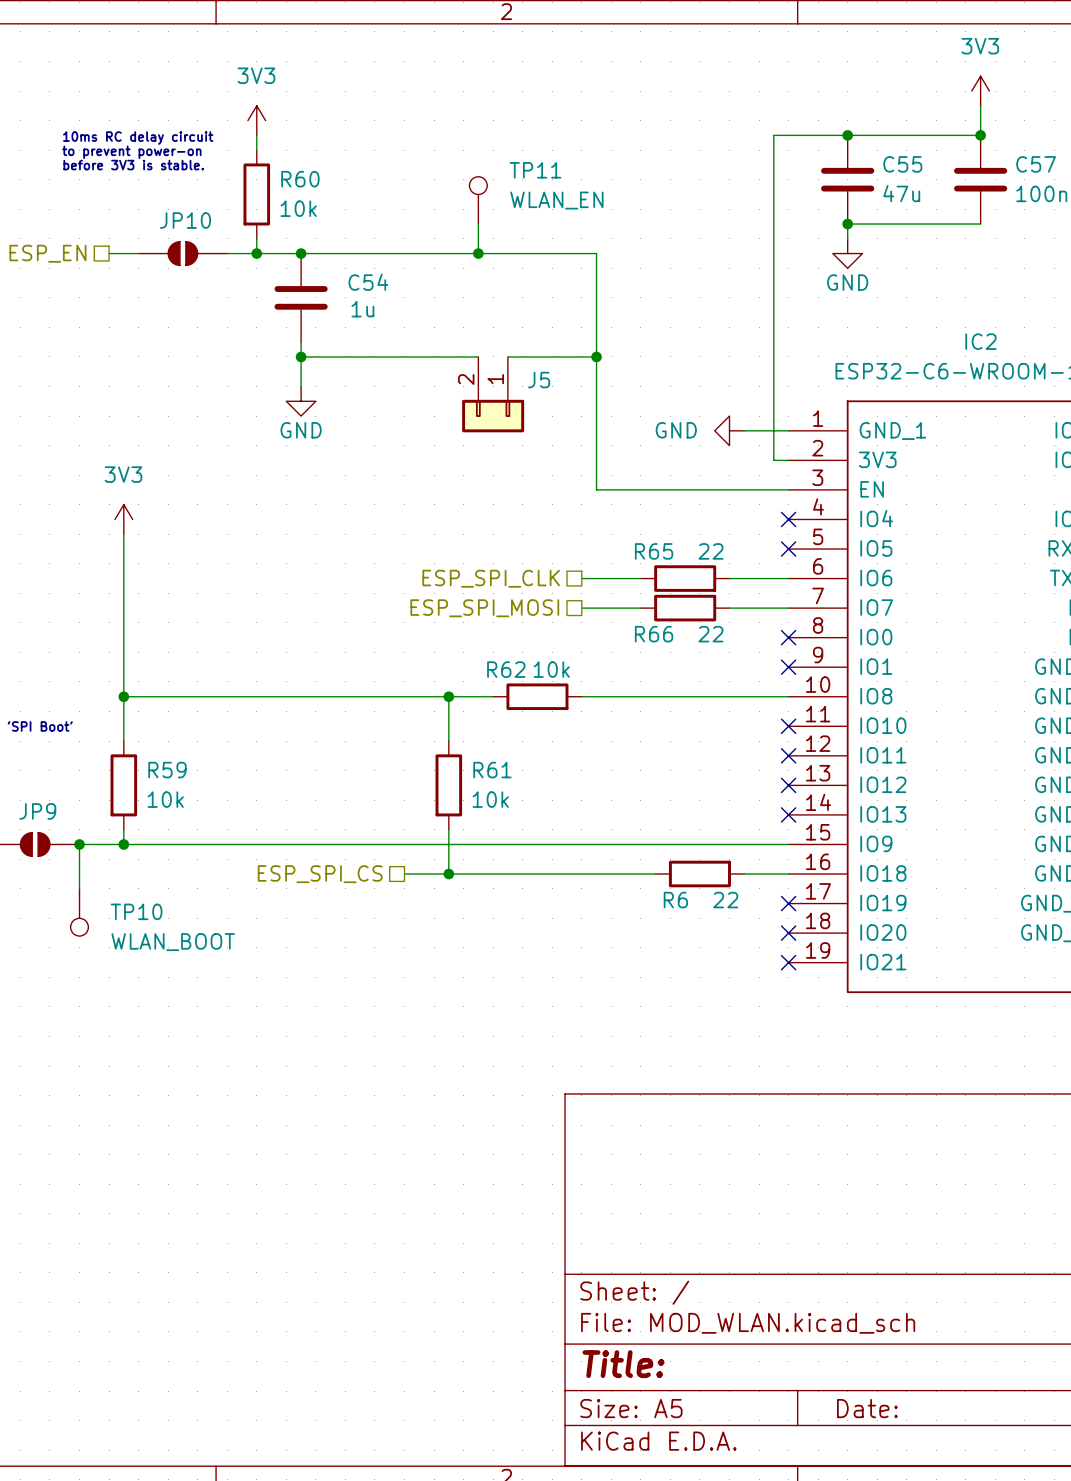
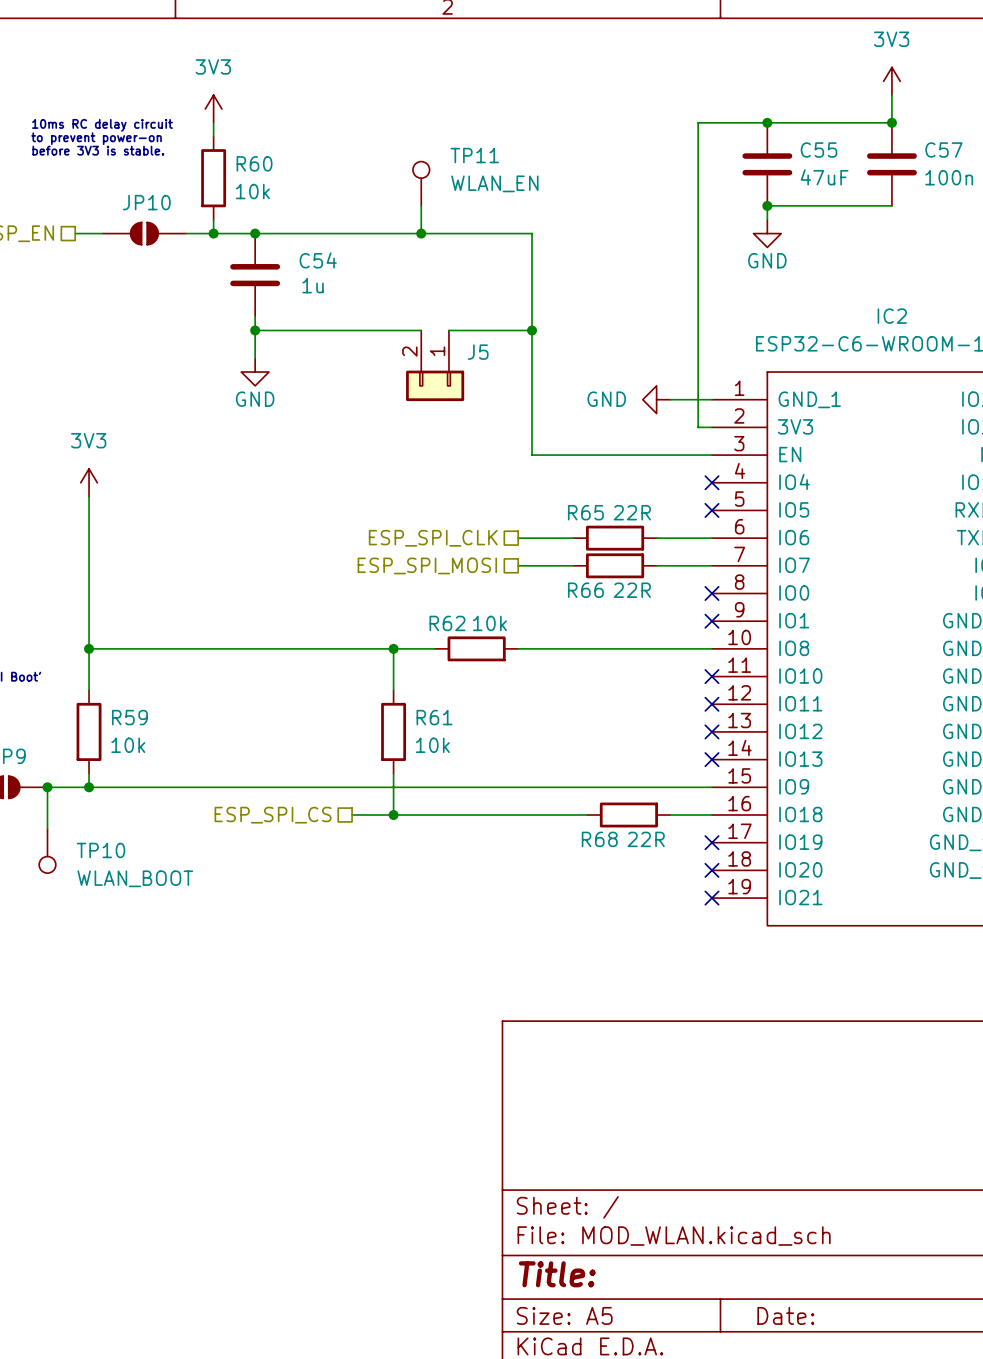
C55 value: 47u (901, 193) -> 47uF (824, 177)
R65 value: 22 (710, 551) -> 22R (632, 512)
R66 value: 22 (710, 634) -> 22R (632, 590)
R6 name: R6 (675, 900) -> R68 (599, 839)
R6 value: 22 (725, 900) -> 22R (646, 839)

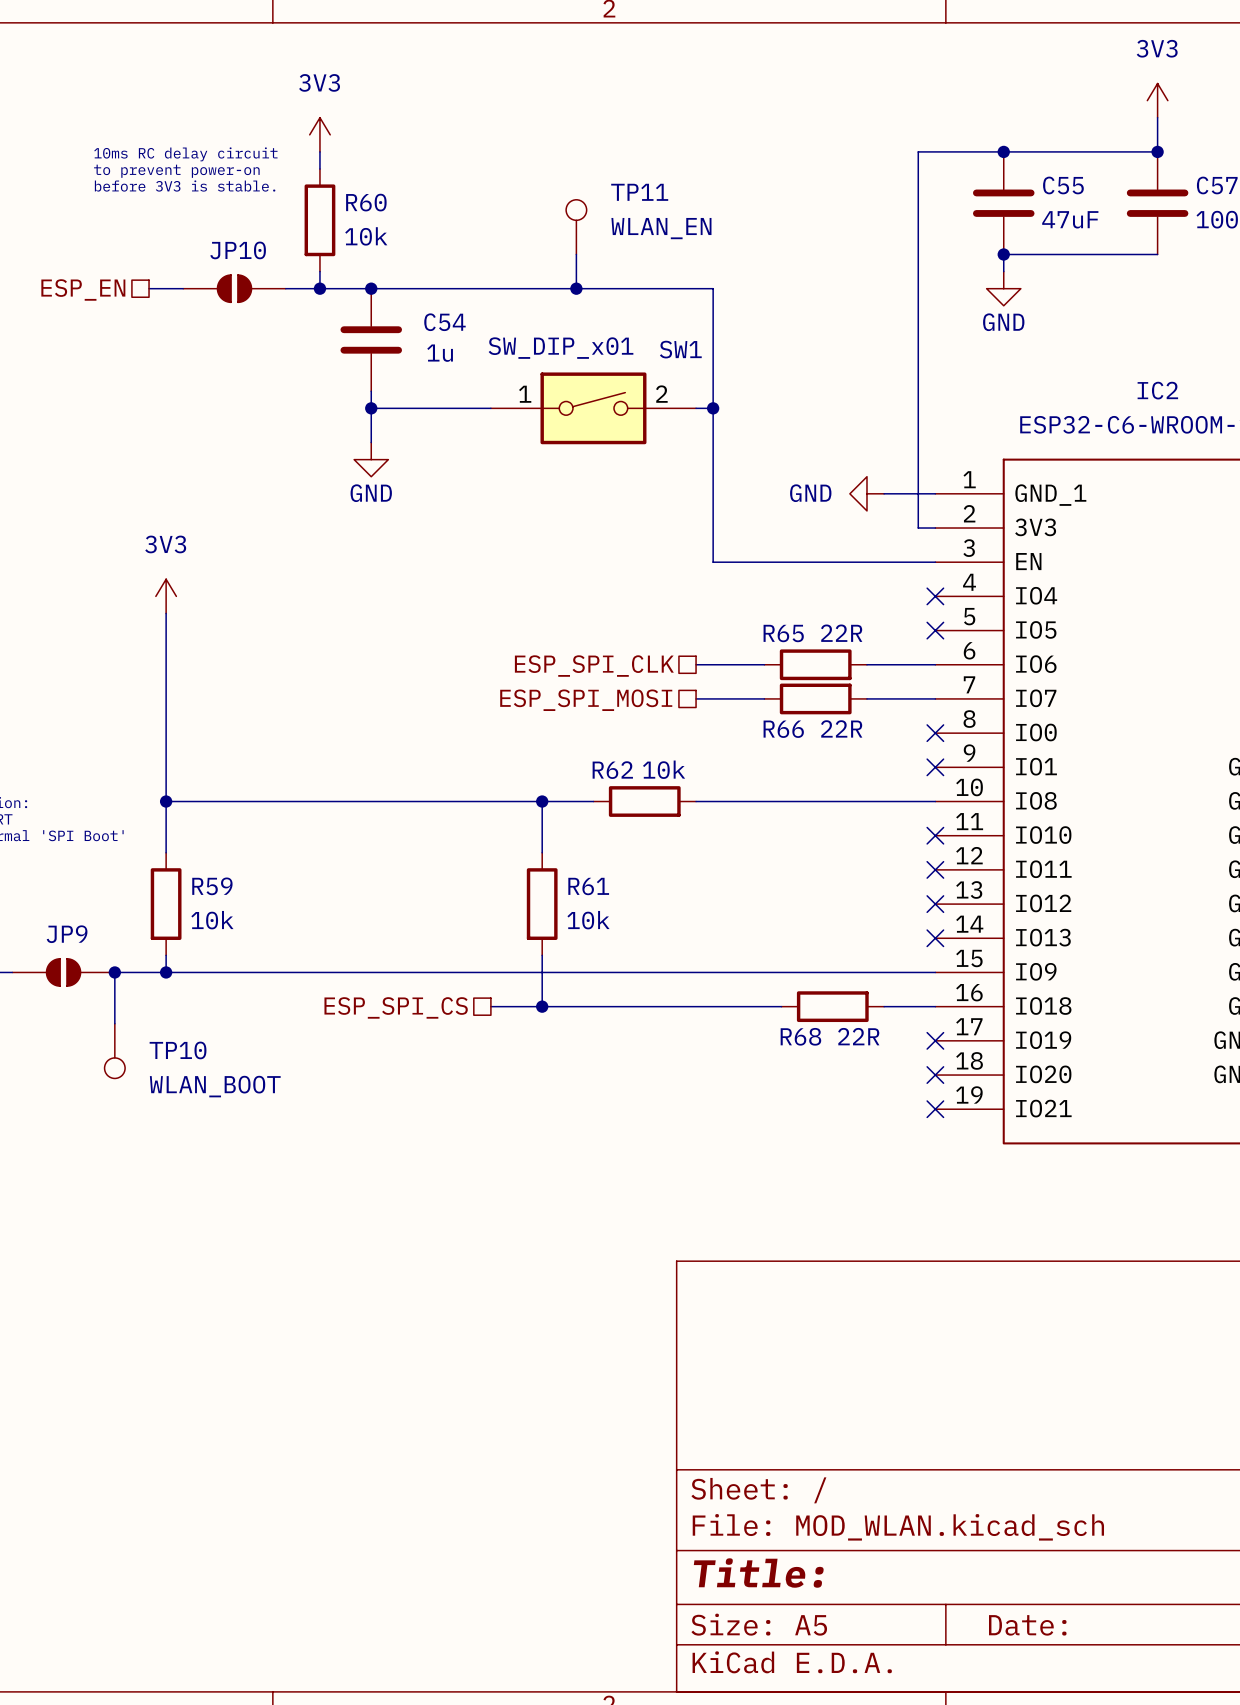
SW1: none -> SW_DIP_x01 (593, 408)
J5: (435, 365) -> none

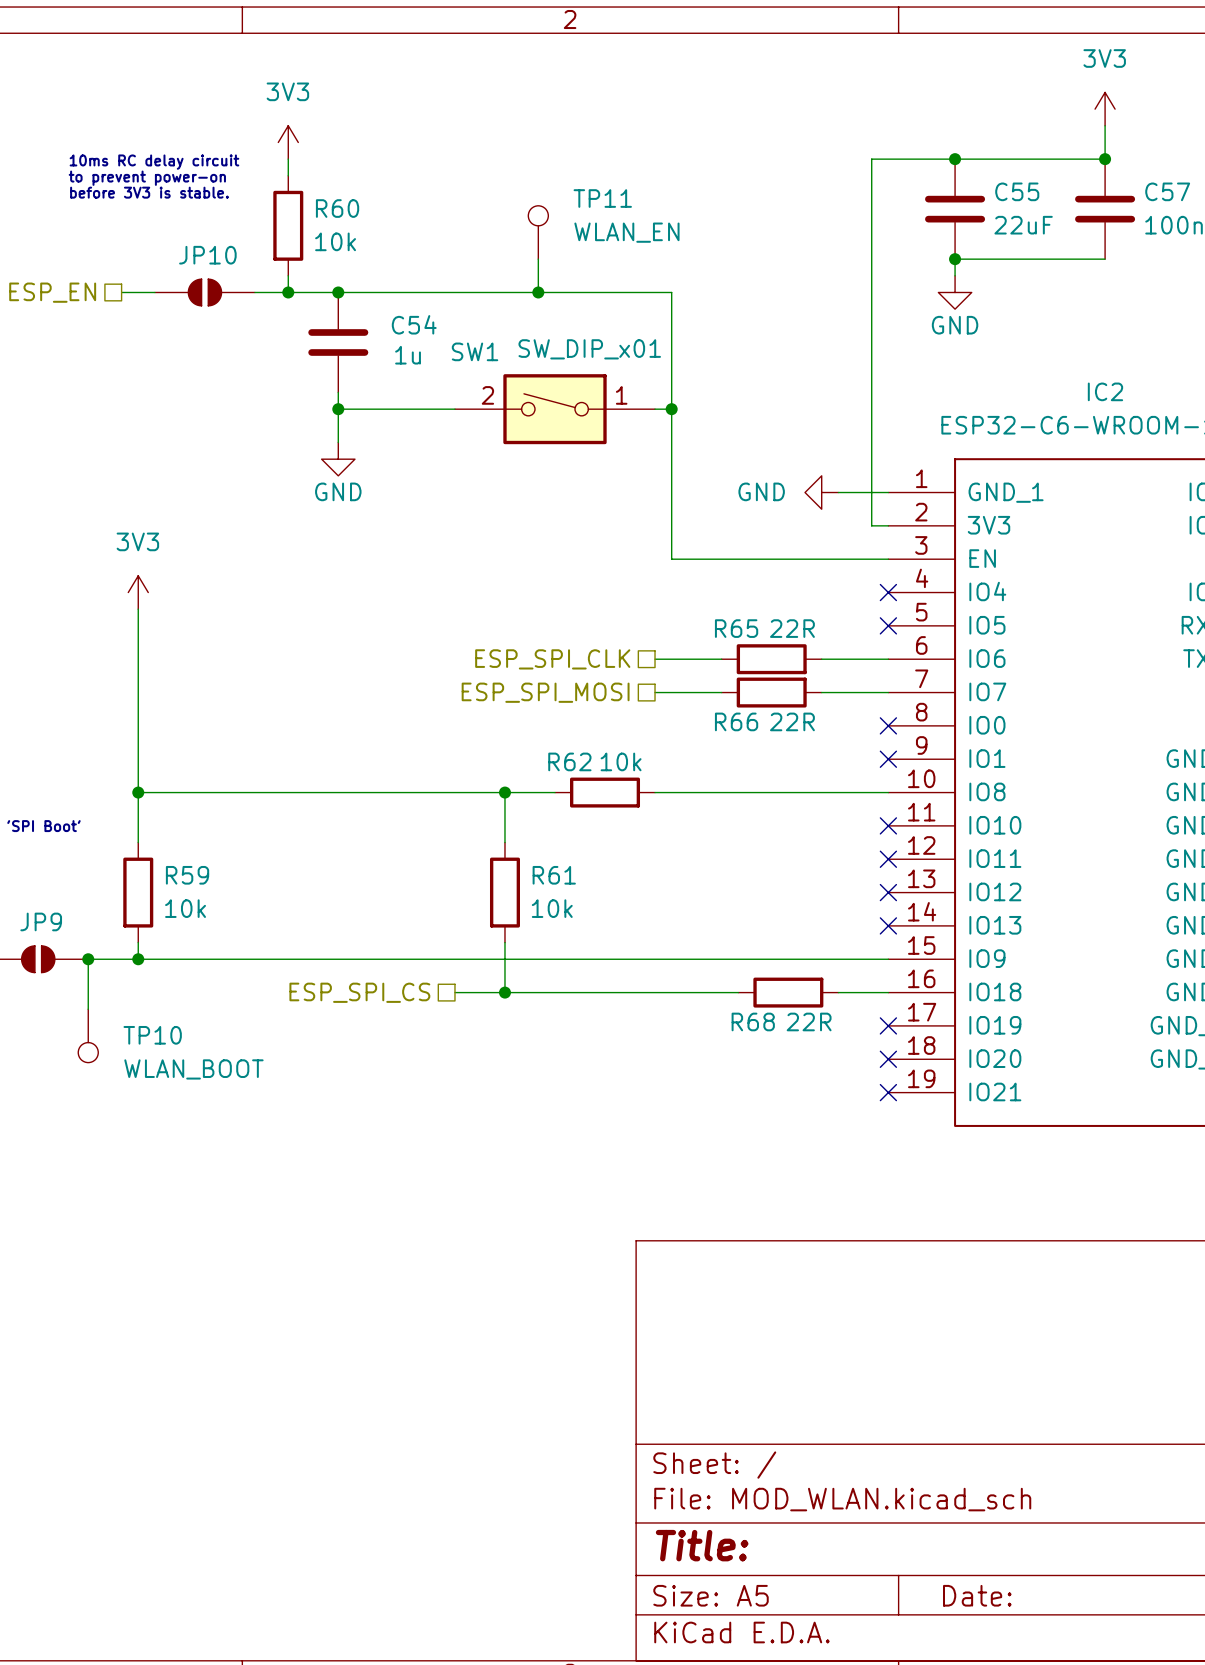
C55 value: 47uF (1070, 219) -> 22uF (1023, 225)
SW1 flip: as is (593, 408) -> left-right (554, 409)

